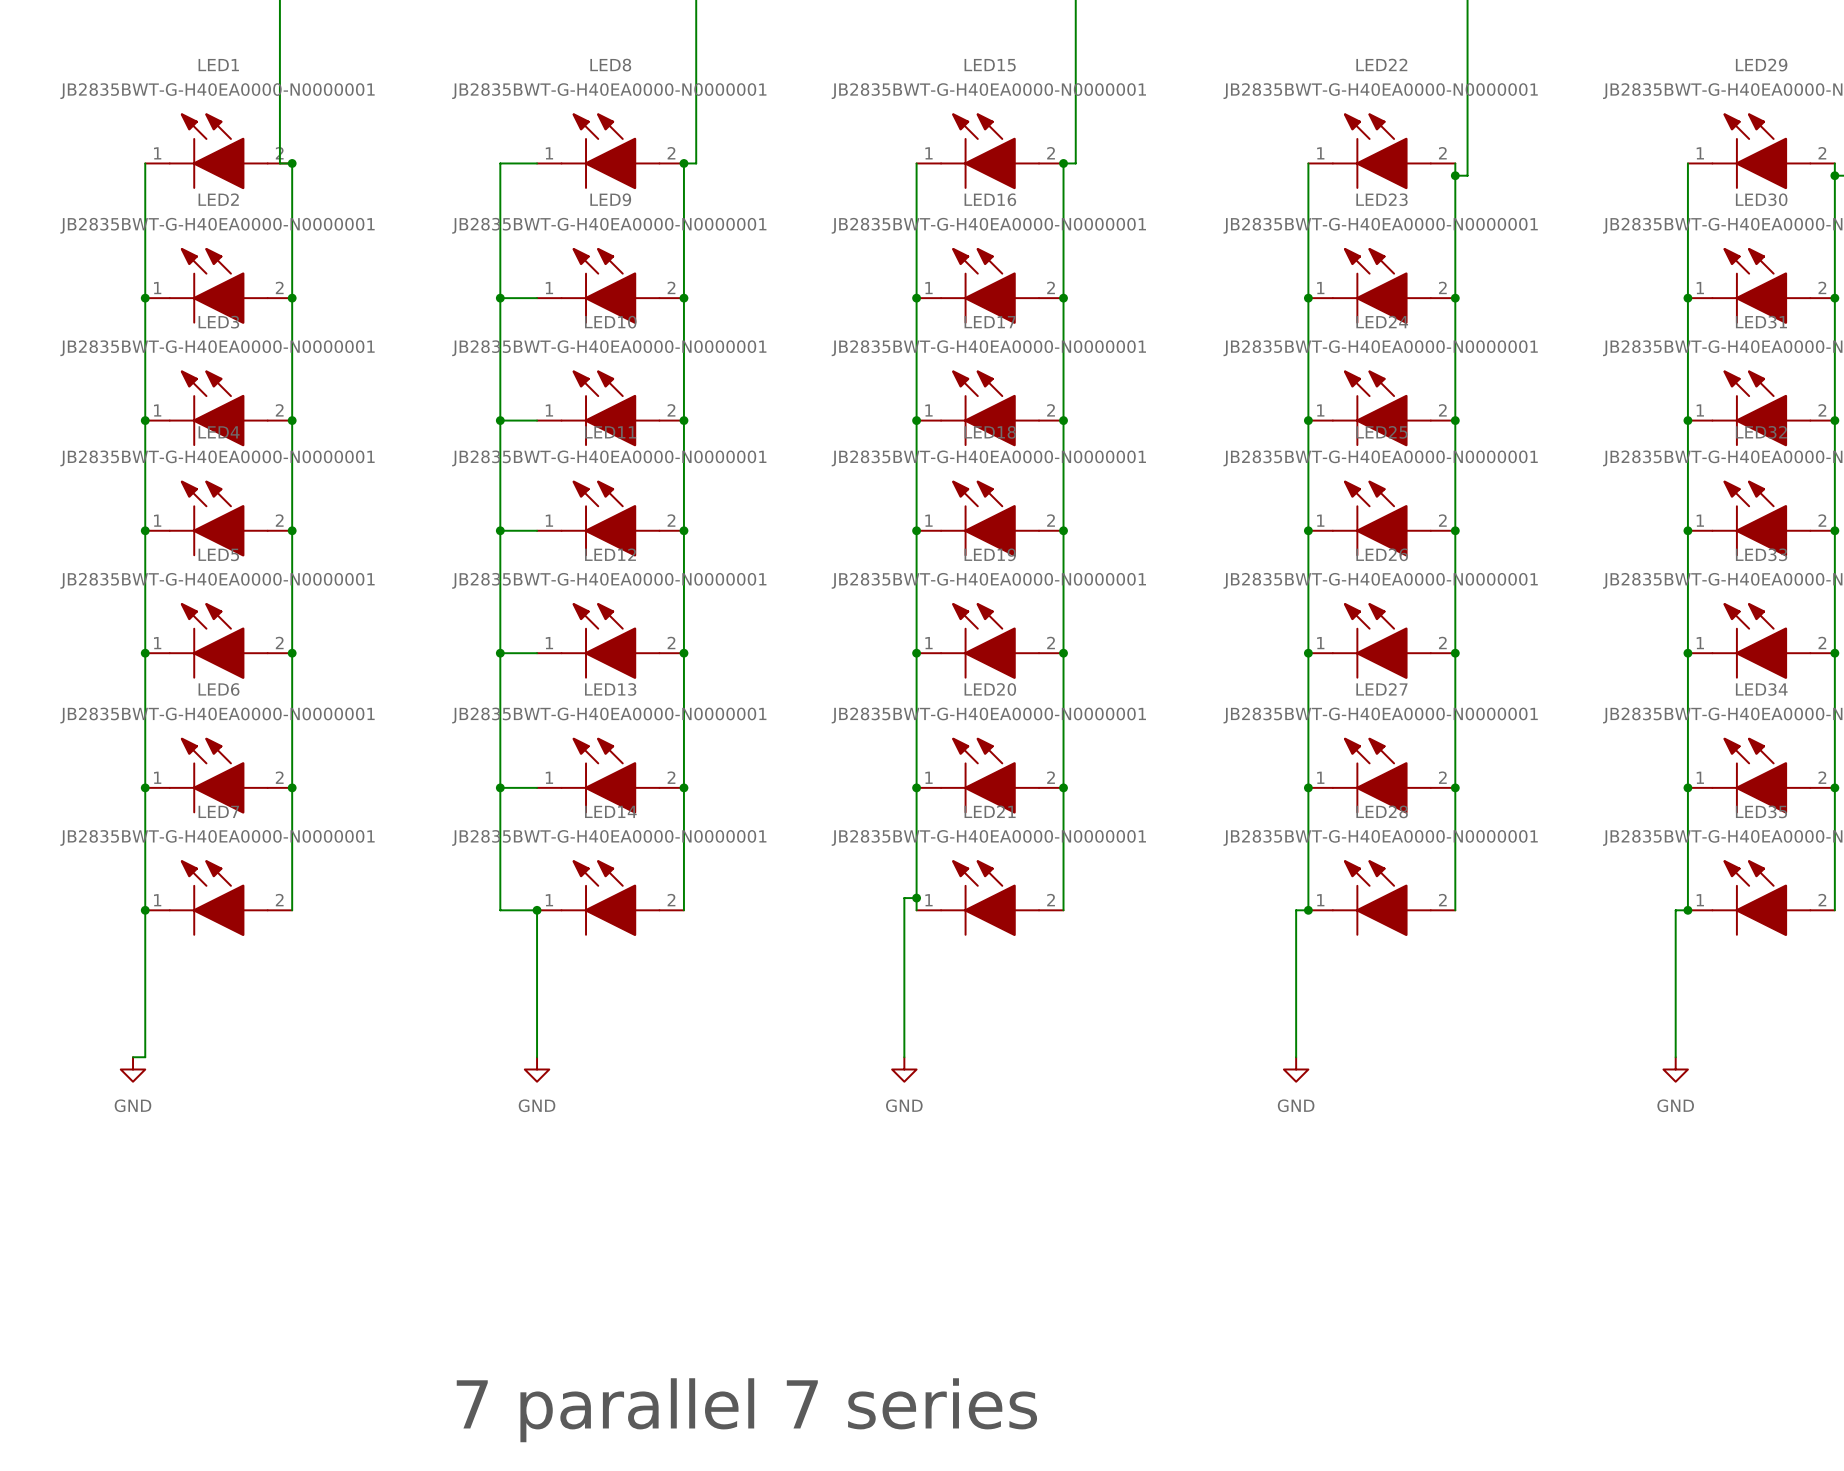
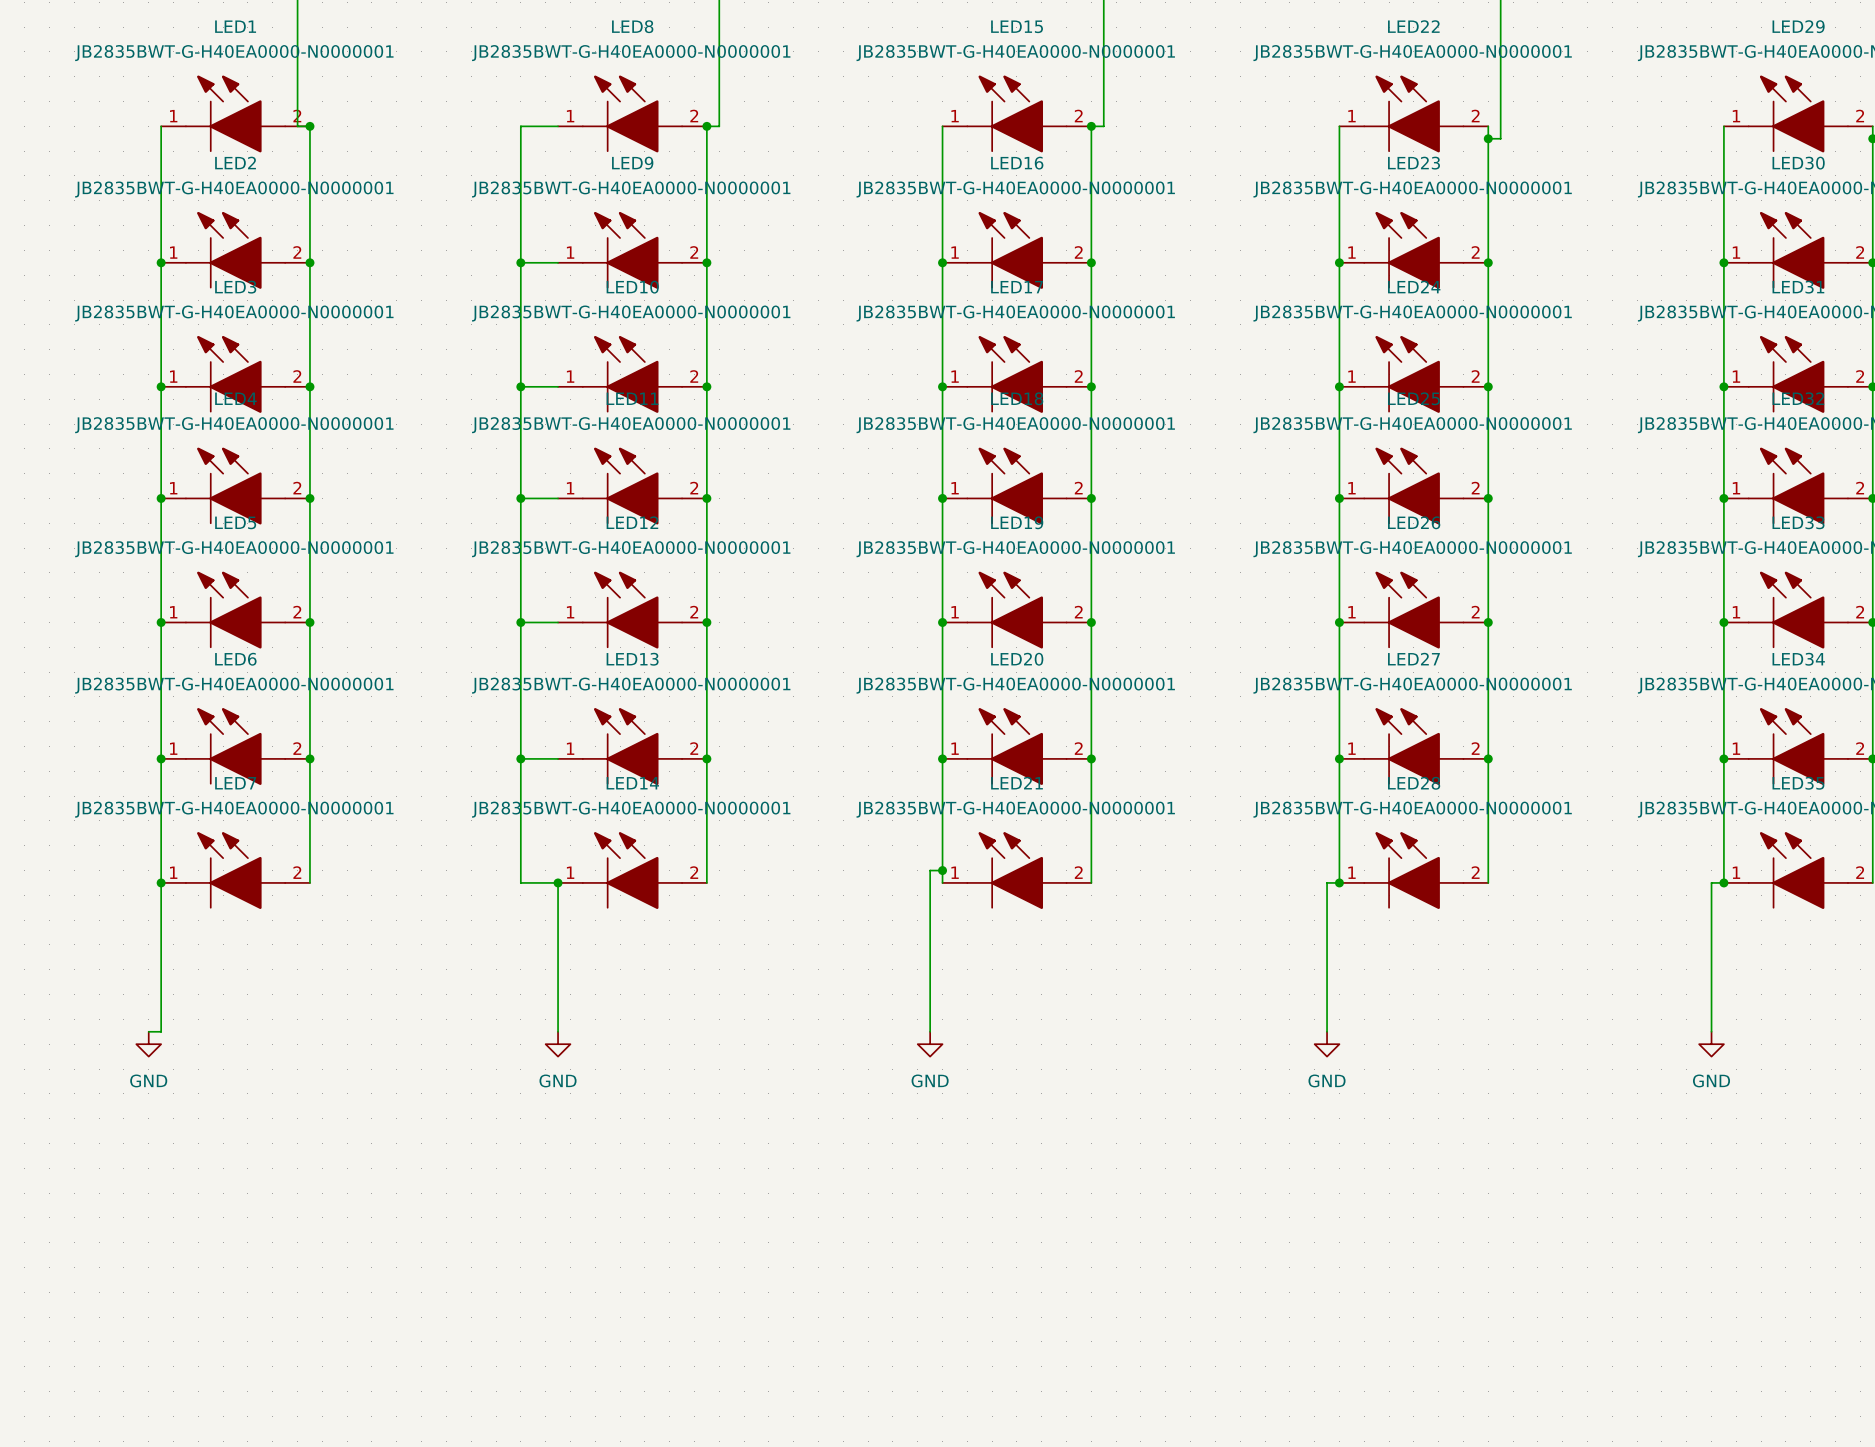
text: 7 parallel 7 series (746, 1410) -> none

